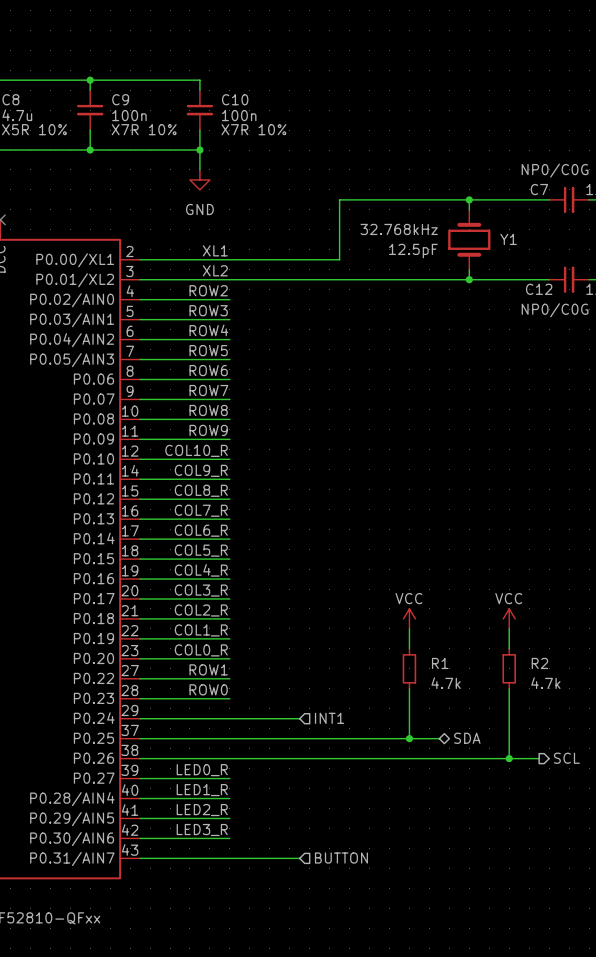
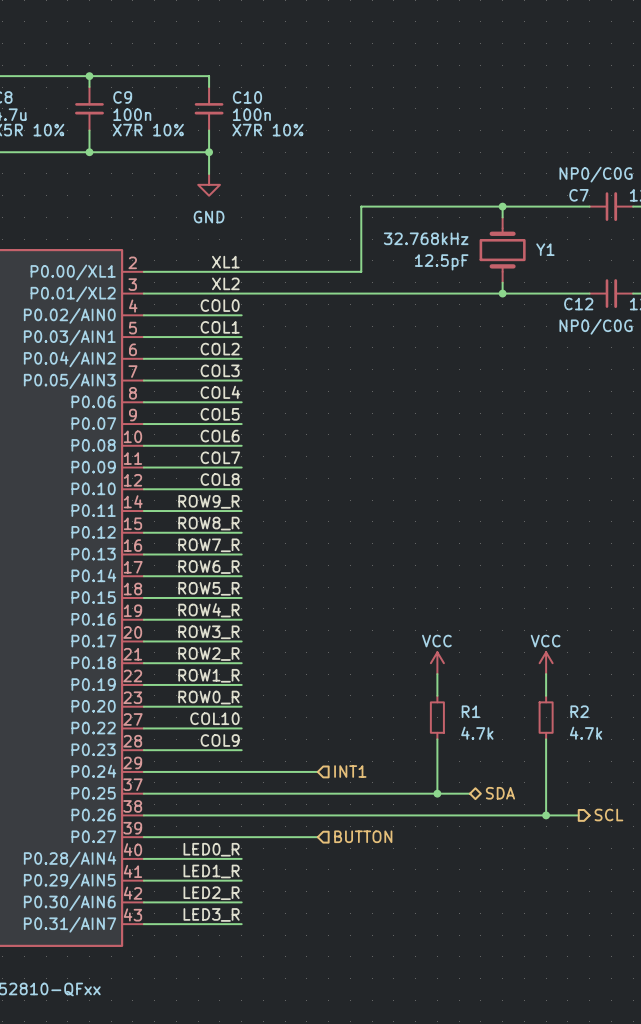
label: ROW2 (208, 290) -> COL0 (220, 305)
label: ROW3 (208, 310) -> COL1 (220, 327)
label: ROW4 (208, 330) -> COL2 (220, 349)
label: ROW5 (208, 350) -> COL3 (220, 370)
label: ROW6 (208, 370) -> COL4 (220, 392)
label: ROW7 (208, 390) -> COL5 (220, 414)
label: ROW8 (208, 410) -> COL6 (220, 436)
label: ROW9 (208, 430) -> COL7 (220, 457)
label: COL10_R (196, 450) -> COL8 (220, 479)
label: COL9_R (201, 470) -> ROW9_R (209, 501)
label: COL8_R (201, 490) -> ROW8_R (209, 523)
label: COL7_R (201, 510) -> ROW7_R (209, 545)
label: COL6_R (201, 530) -> ROW6_R (209, 567)
label: COL5_R (201, 550) -> ROW5_R (209, 588)
label: COL4_R (201, 570) -> ROW4_R (209, 610)
label: COL3_R (201, 590) -> ROW3_R (209, 632)
label: COL2_R (201, 610) -> ROW2_R (209, 654)
label: COL1_R (201, 630) -> ROW1_R (209, 675)
label: COL0_R (201, 650) -> ROW0_R (209, 697)
label: ROW1 (208, 669) -> COL10 (214, 718)
label: ROW0 (208, 689) -> COL9 (220, 740)
label: LED0_R (202, 770) -> none
label: LED1_R (202, 790) -> LED0_R (211, 849)
label: LED2_R (202, 810) -> LED1_R (211, 871)
label: LED3_R (202, 830) -> LED2_R (211, 893)
label: none -> LED3_R (211, 914)
wire: (229, 858) (299, 858) -> (241, 837) (317, 837)
hierarchical label position: BUTTON (341, 858) -> BUTTON (363, 836)

